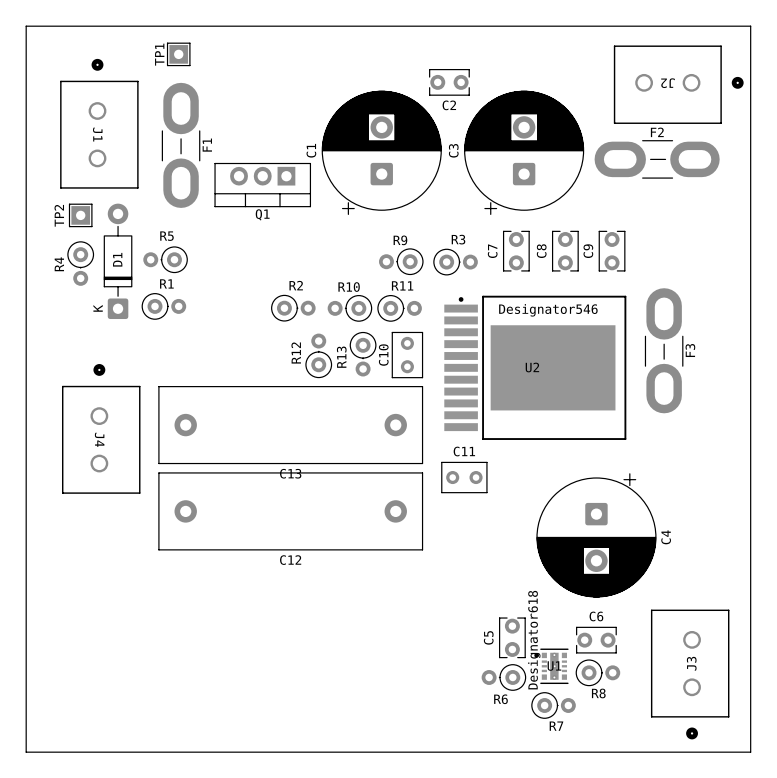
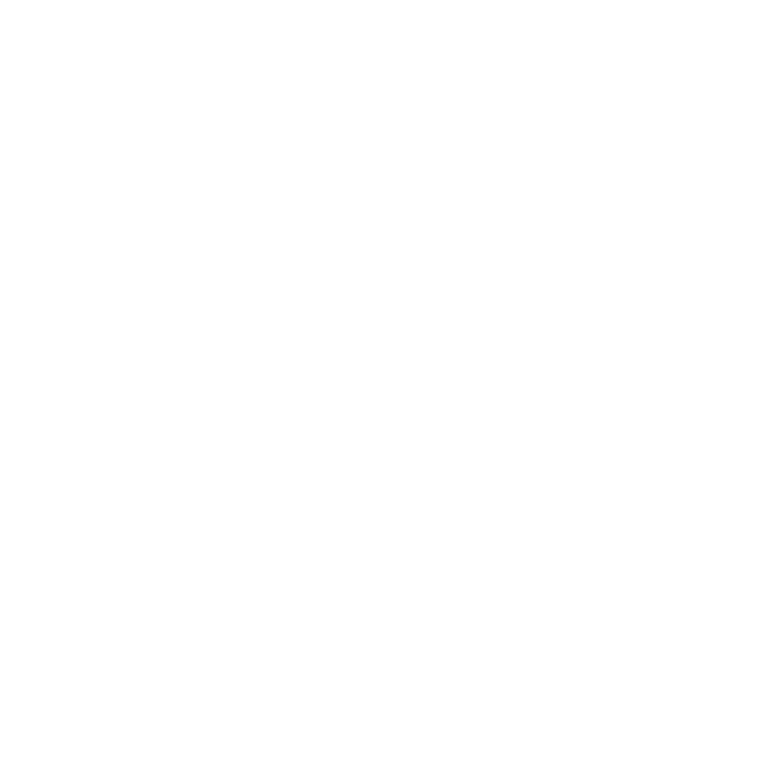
board edge: (26, 26) (750, 26) (750, 752) (26, 752) (26, 26) -> none
TP1: (178, 54) -> none
C2: (449, 82) -> none
J2: (678, 84) -> none
J1: (99, 123) -> none
F1: (181, 145) -> none
C1: (381, 152) -> none
C3: (524, 152) -> none
F2: (657, 159) -> none
Q1: (262, 185) -> none
TP2: (80, 215) -> none
C7: (516, 251) -> none
C8: (565, 251) -> none
C9: (612, 251) -> none
R5: (165, 259) -> none
D1: (118, 261) -> none
R9: (401, 261) -> none
R3: (455, 262) -> none
R4: (80, 263) -> none
R1: (163, 306) -> none
R2: (293, 308) -> none
R10: (349, 308) -> none
R11: (399, 308) -> none
F3: (664, 350) -> none
R13: (363, 354) -> none
R12: (318, 355) -> none
C10: (407, 355) -> none
U2: (535, 367) -> none
C13: (290, 425) -> none
J4: (101, 428) -> none
C11: (464, 477) -> none
C12: (290, 511) -> none
C4: (596, 535) -> none
C5: (512, 637) -> none
C6: (596, 640) -> none
U1: (551, 666) -> none
R8: (597, 672) -> none
J3: (690, 674) -> none
R6: (503, 677) -> none
R7: (553, 705) -> none

